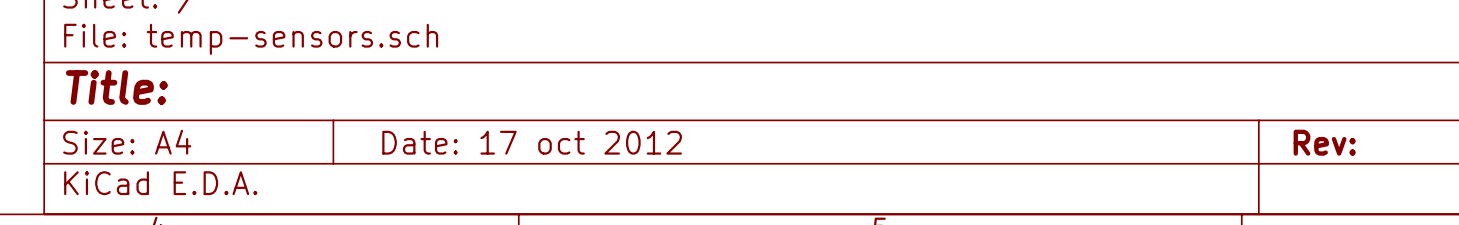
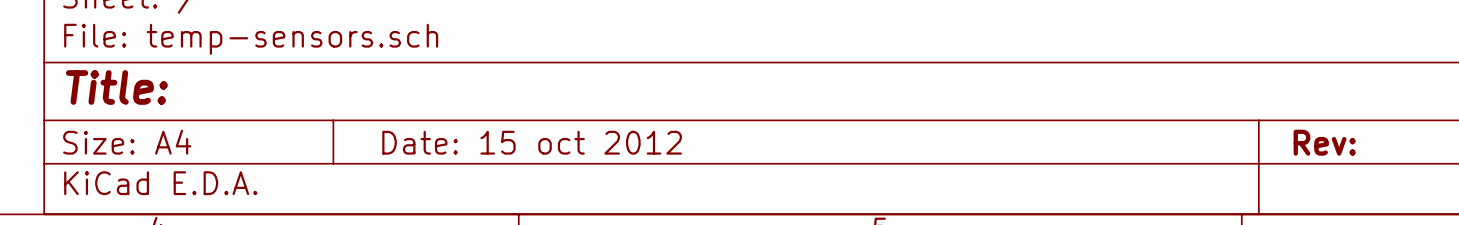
title block: Date: 17 oct 2012 (532, 142) -> Date: 15 oct 2012 (532, 142)

